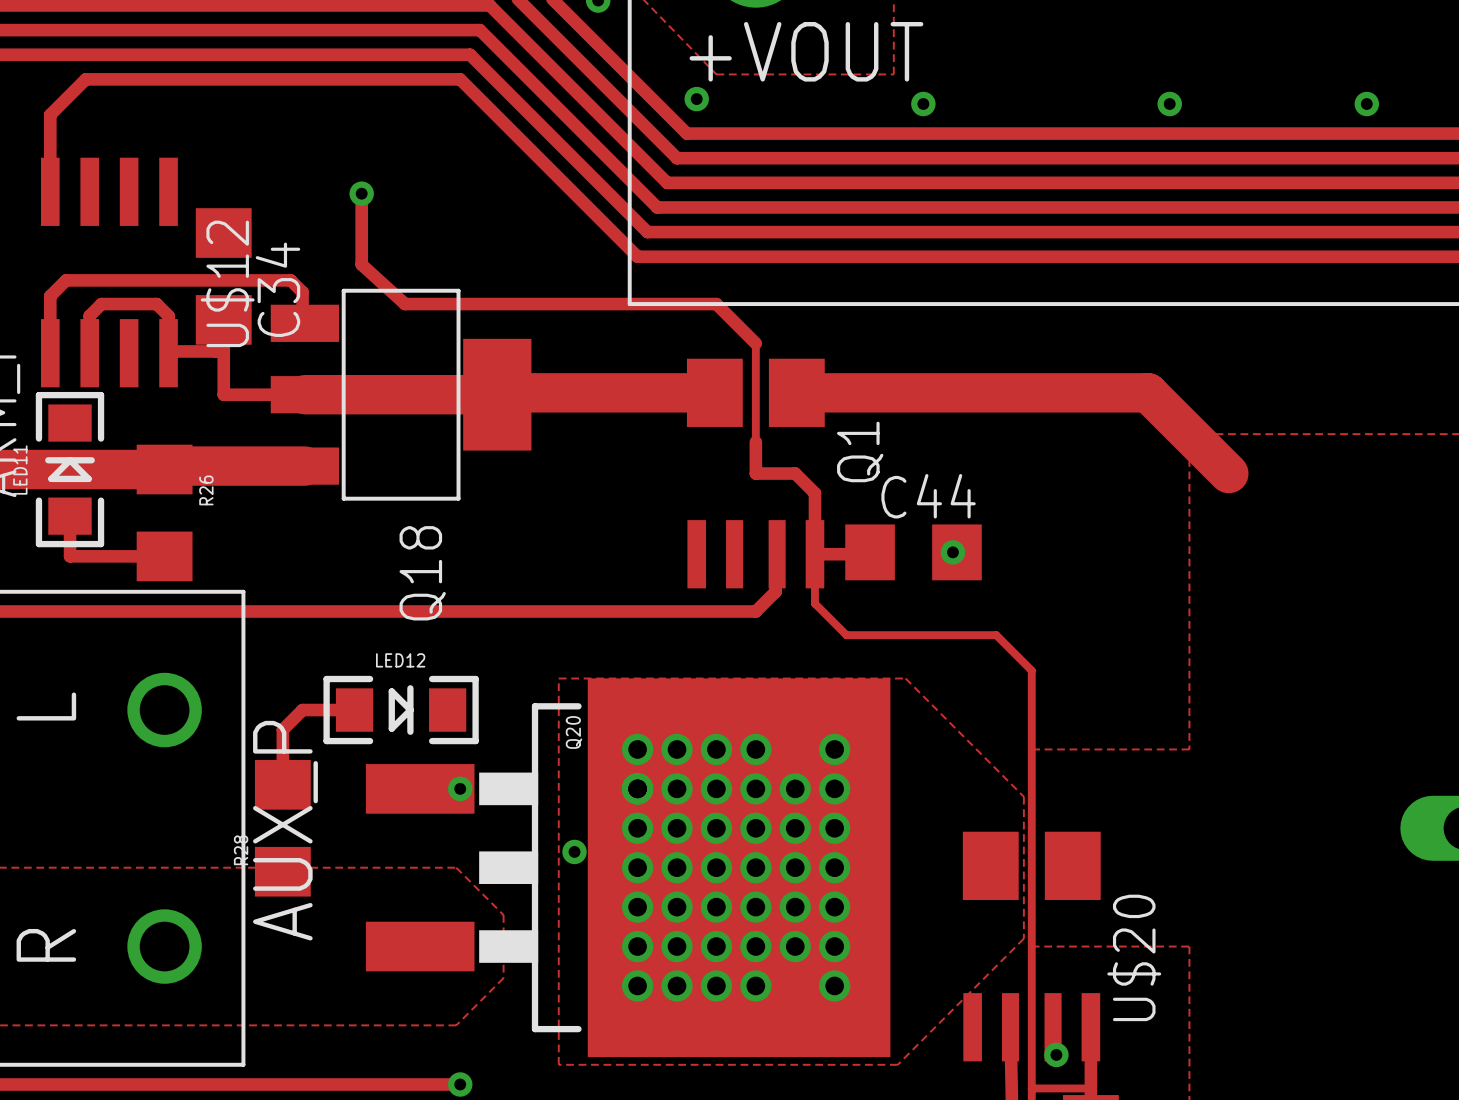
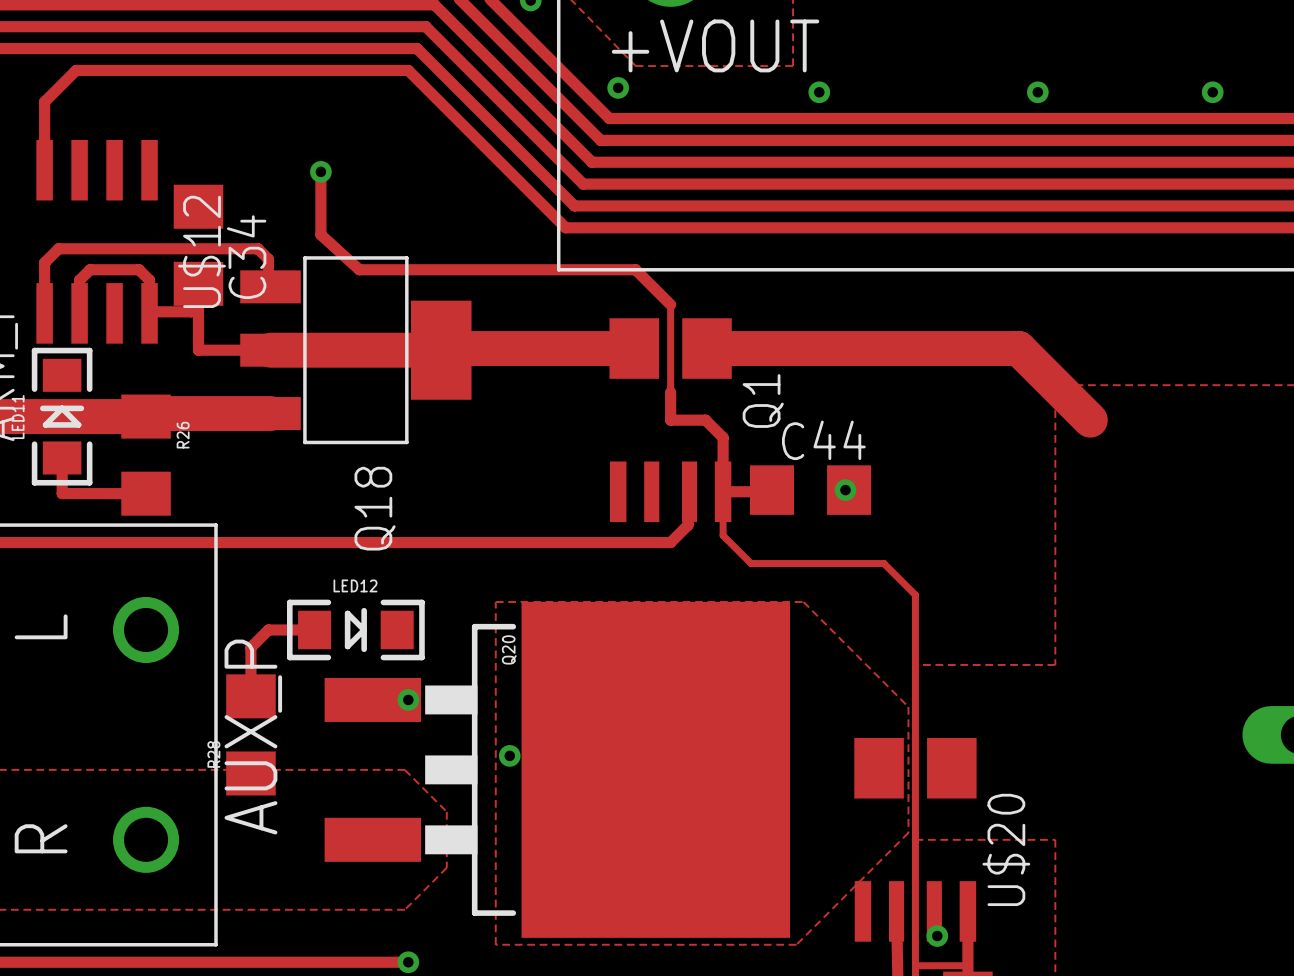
via: (637, 749) -> none
via: (677, 749) -> none
via: (716, 749) -> none
via: (755, 749) -> none
via: (834, 749) -> none
via: (637, 788) -> none
via: (677, 788) -> none
via: (716, 788) -> none
via: (755, 788) -> none
via: (795, 788) -> none
via: (834, 788) -> none
via: (637, 828) -> none
via: (677, 828) -> none
via: (716, 828) -> none
via: (755, 828) -> none
via: (795, 828) -> none
via: (834, 828) -> none
via: (637, 867) -> none
via: (677, 867) -> none
via: (716, 867) -> none
via: (755, 867) -> none
via: (795, 867) -> none
via: (834, 867) -> none
via: (637, 907) -> none
via: (677, 907) -> none
via: (716, 907) -> none
via: (755, 907) -> none
via: (795, 907) -> none
via: (834, 907) -> none
via: (637, 946) -> none
via: (677, 946) -> none
via: (716, 946) -> none
via: (755, 946) -> none
via: (795, 946) -> none
via: (834, 946) -> none
via: (637, 985) -> none
via: (677, 985) -> none
via: (716, 985) -> none
via: (755, 985) -> none
via: (834, 985) -> none

